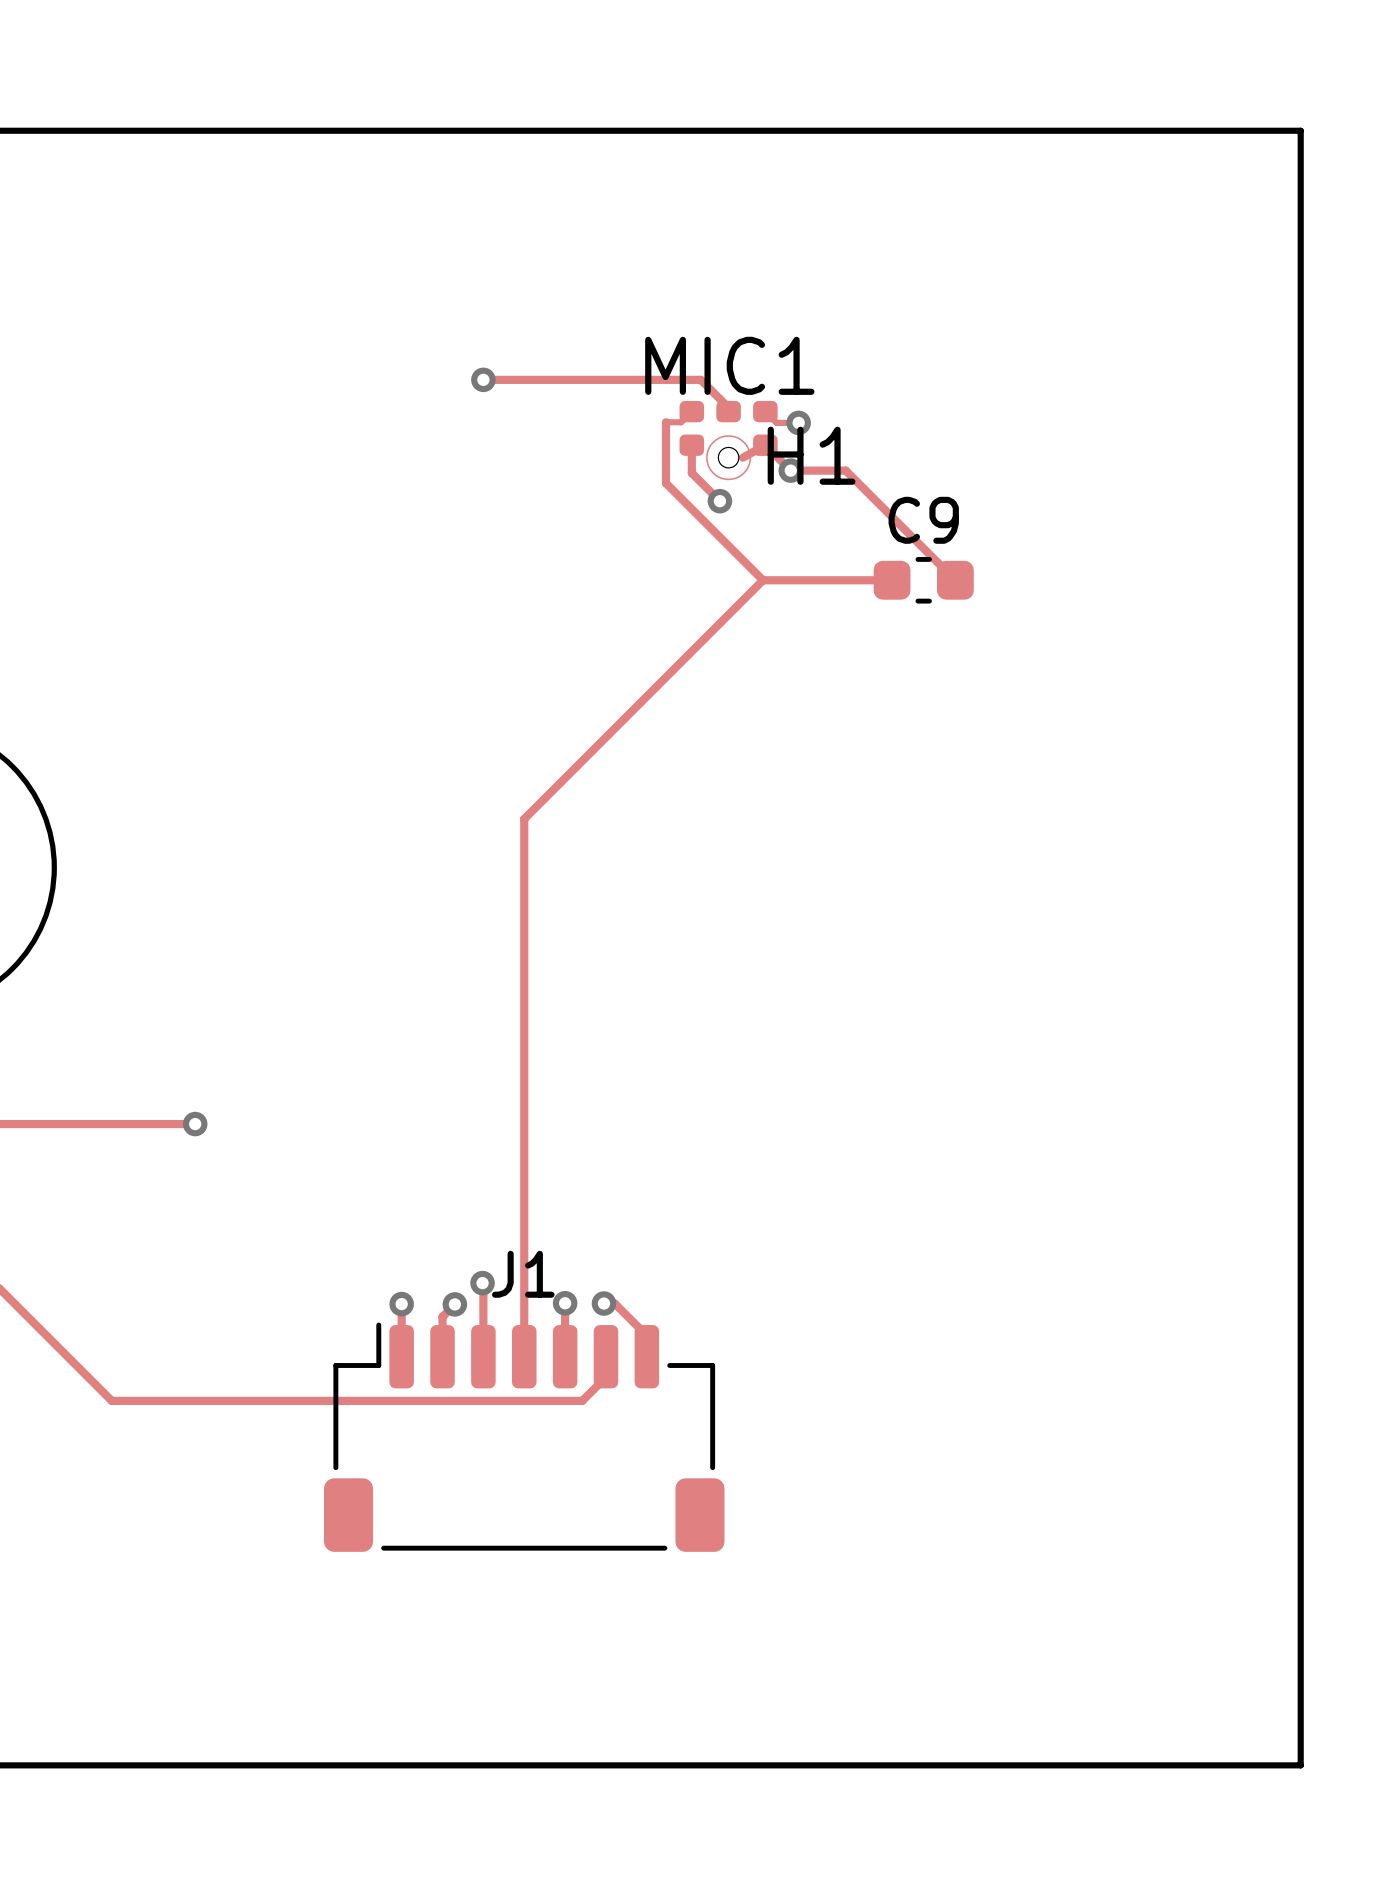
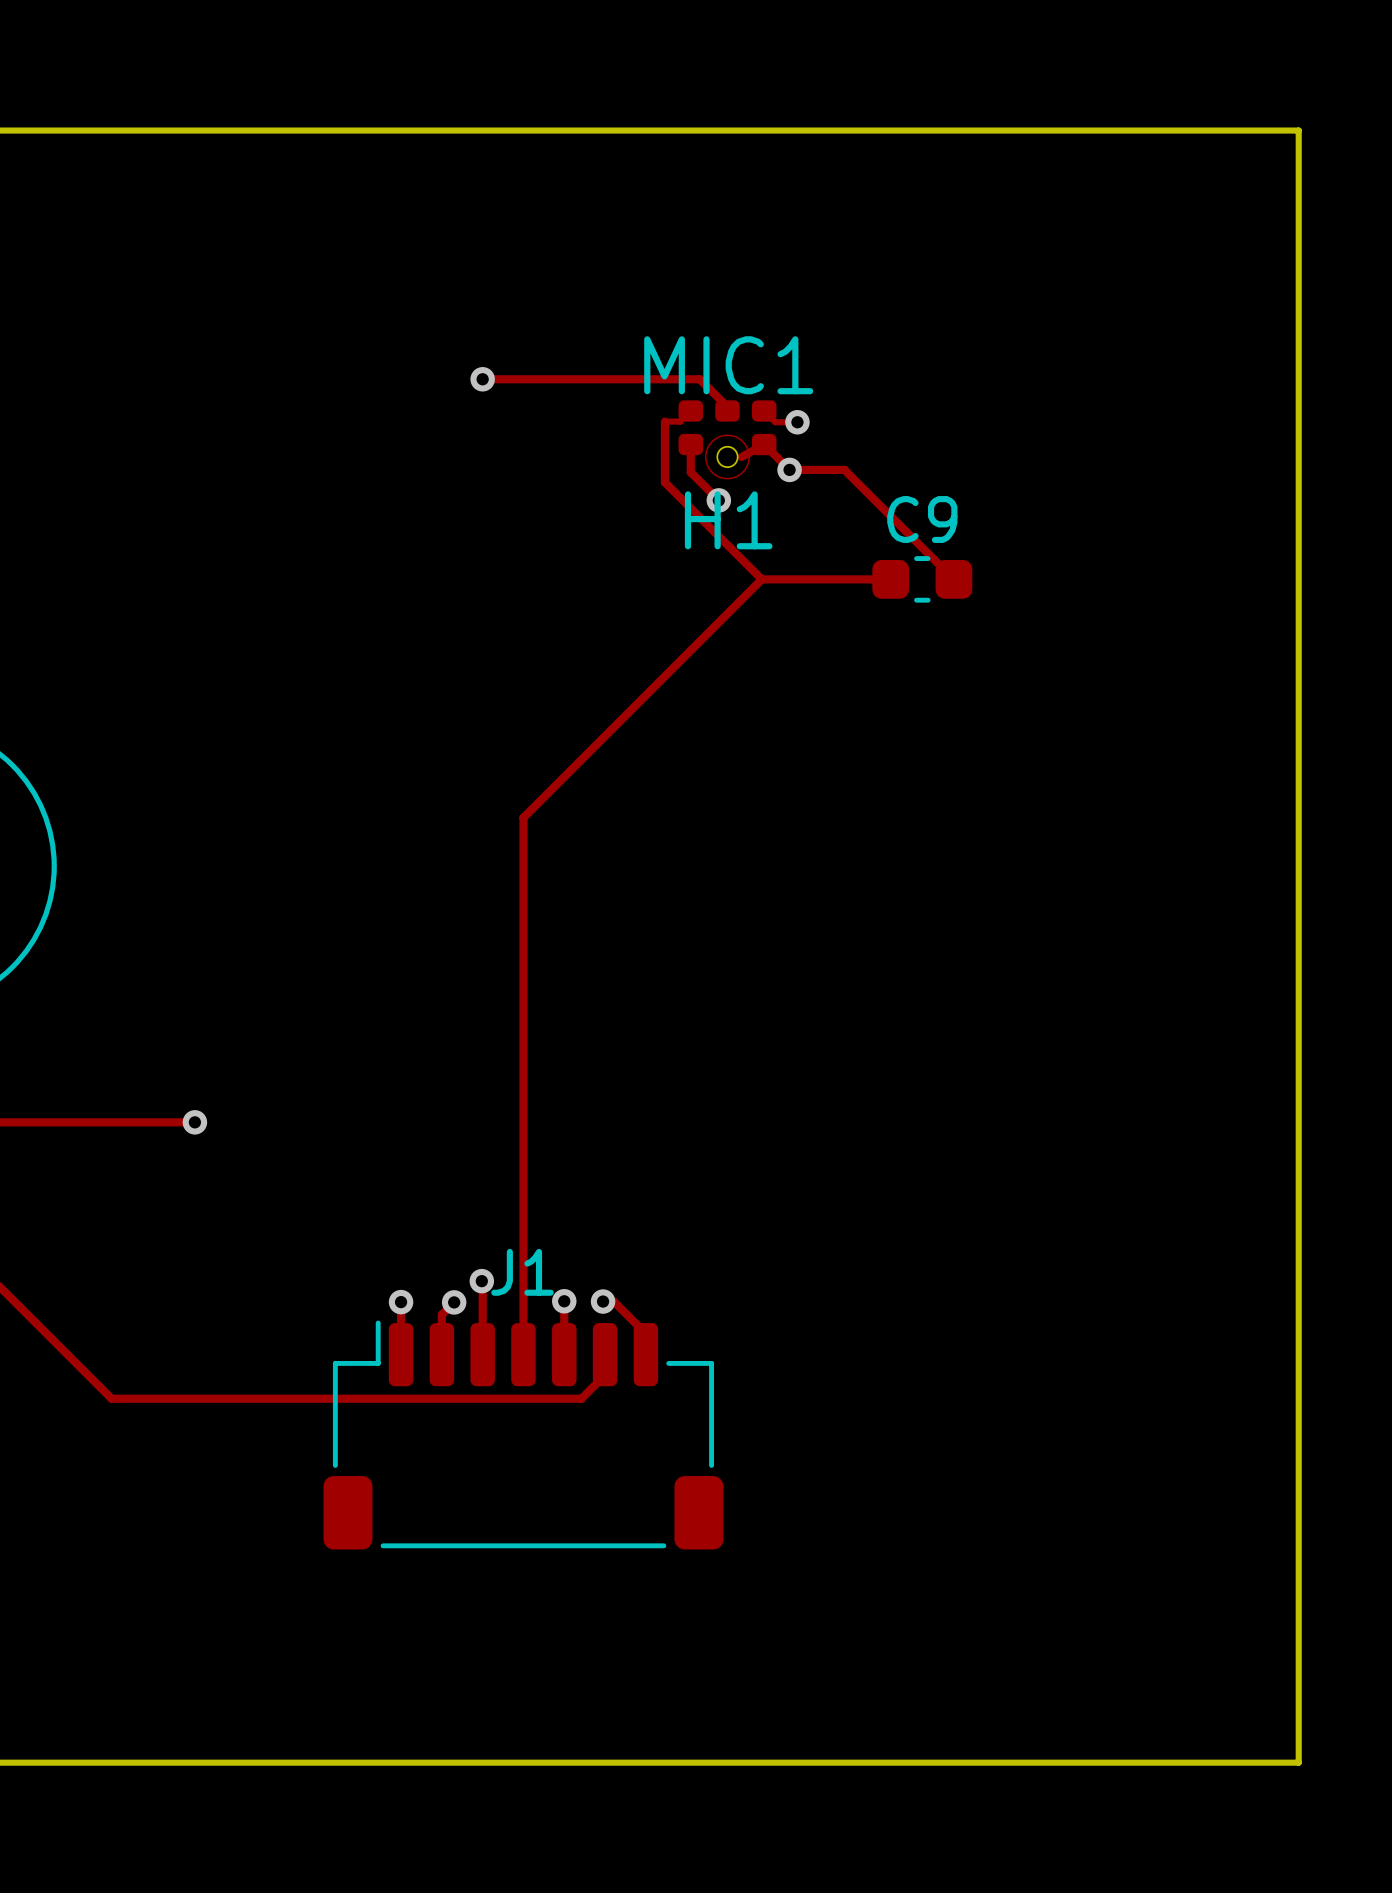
H1 name position: H1 (811, 455) -> H1 (728, 520)

